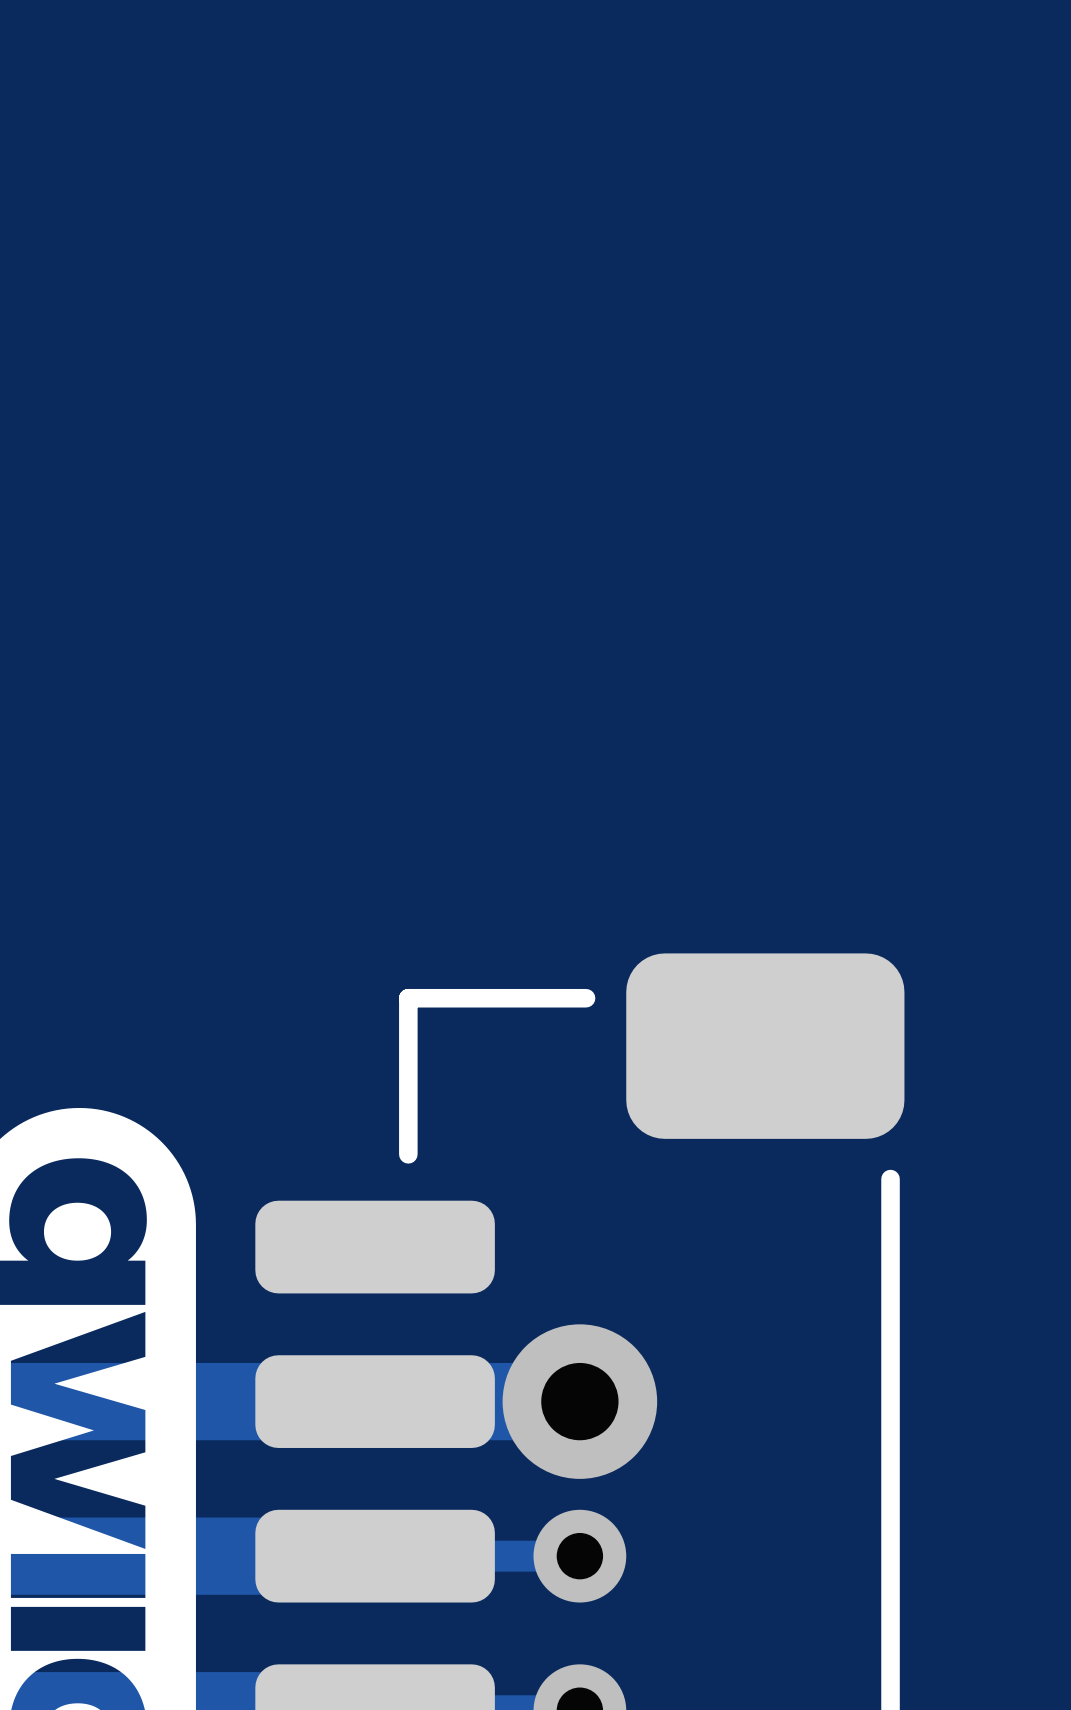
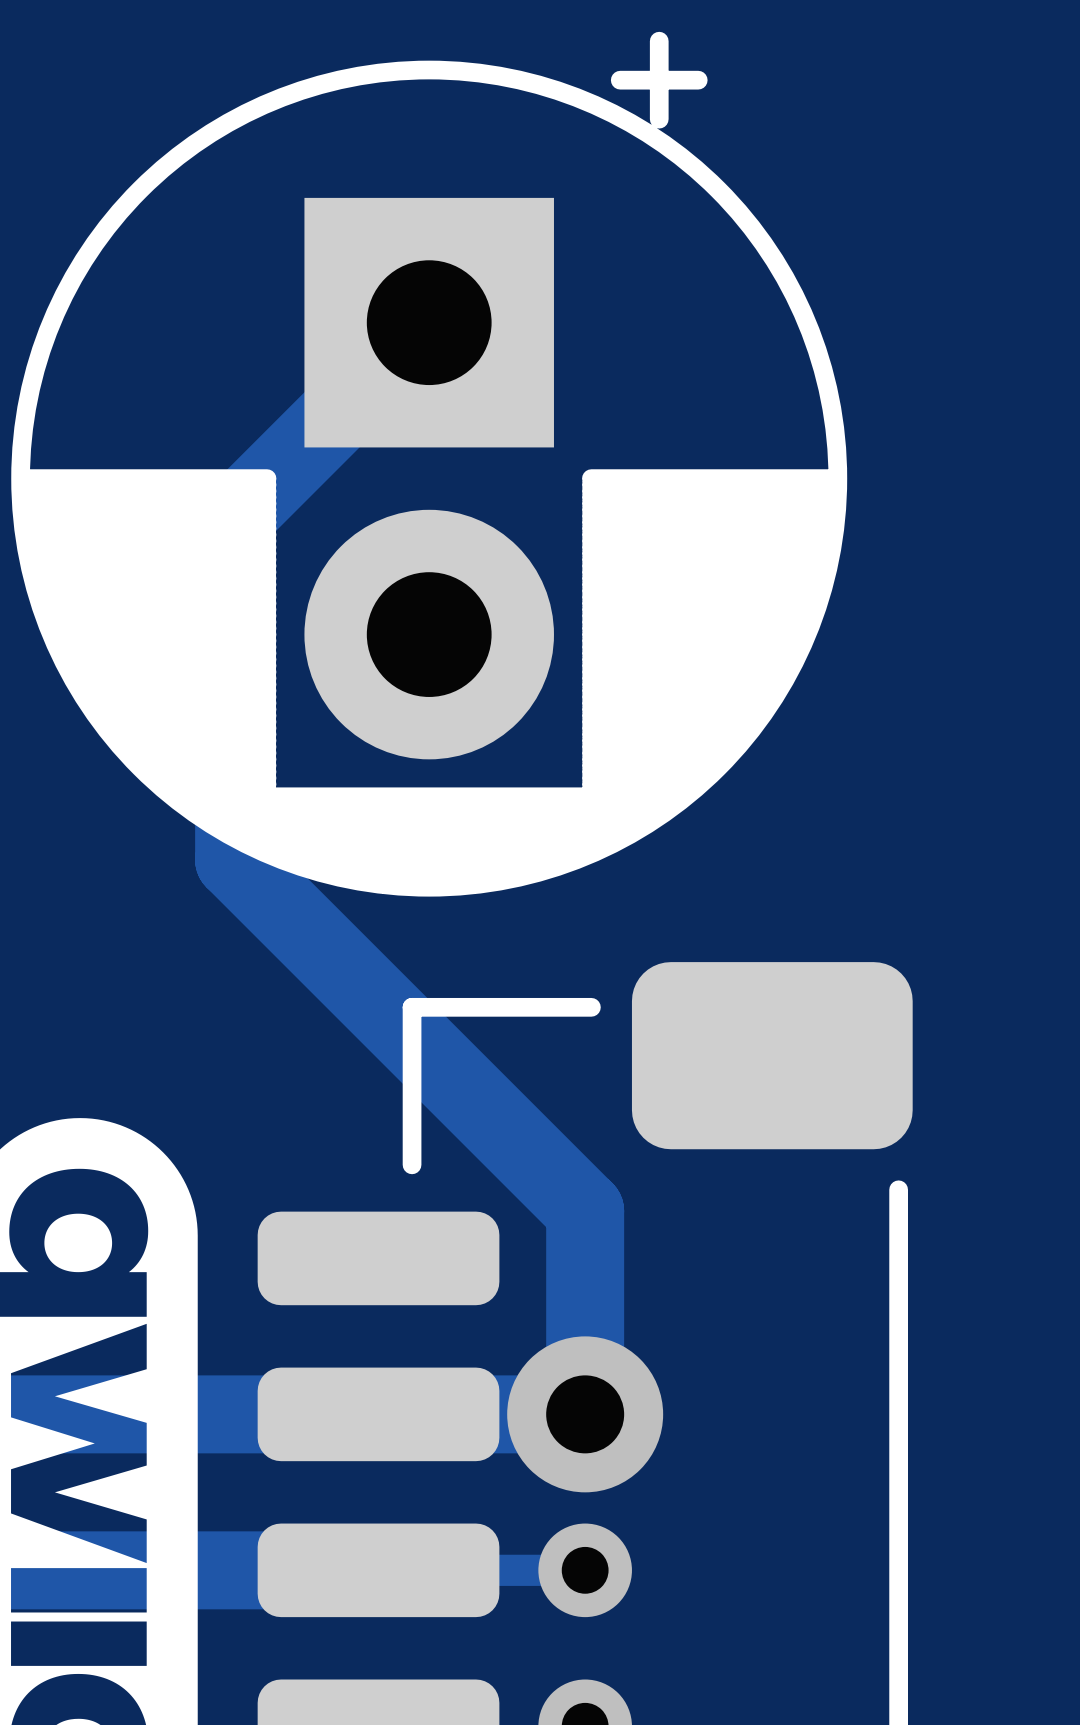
track: none -> (429, 322) (234, 517) (234, 859) (585, 1210) (585, 1414)
part: none -> (429, 464)

